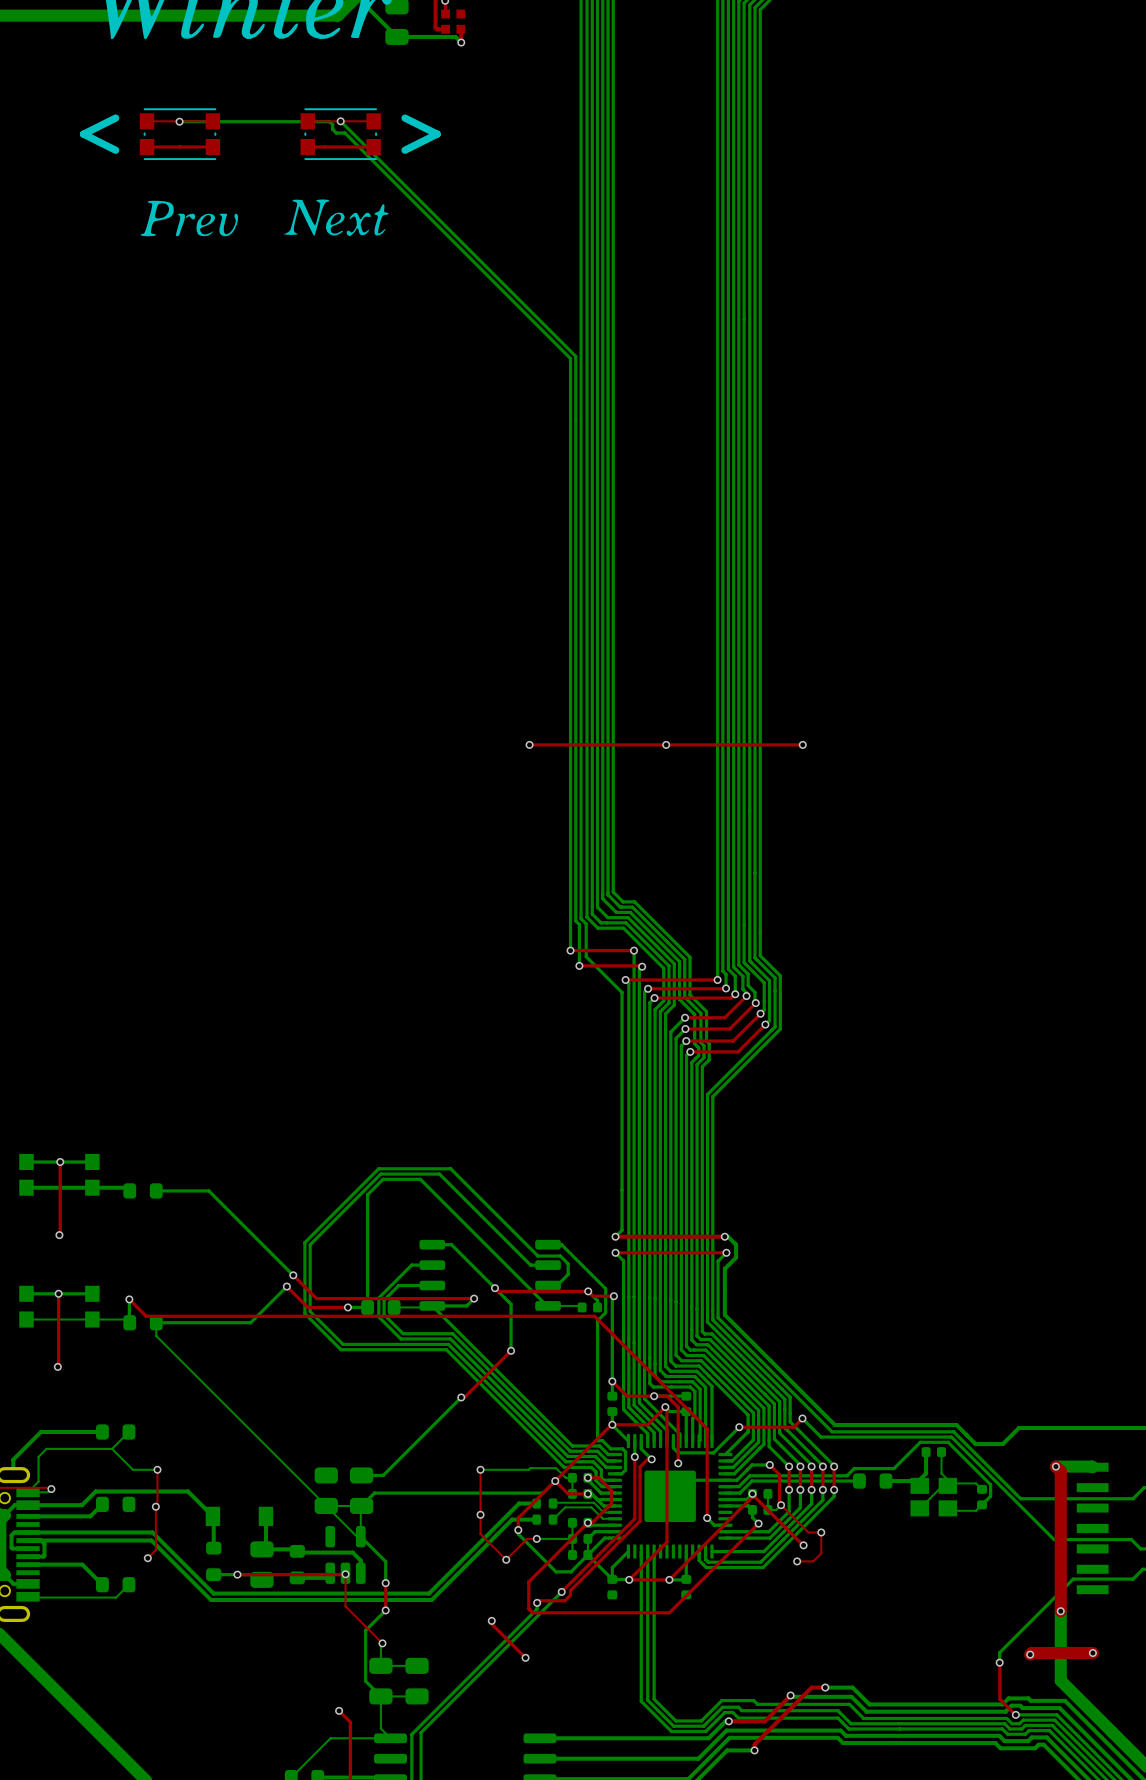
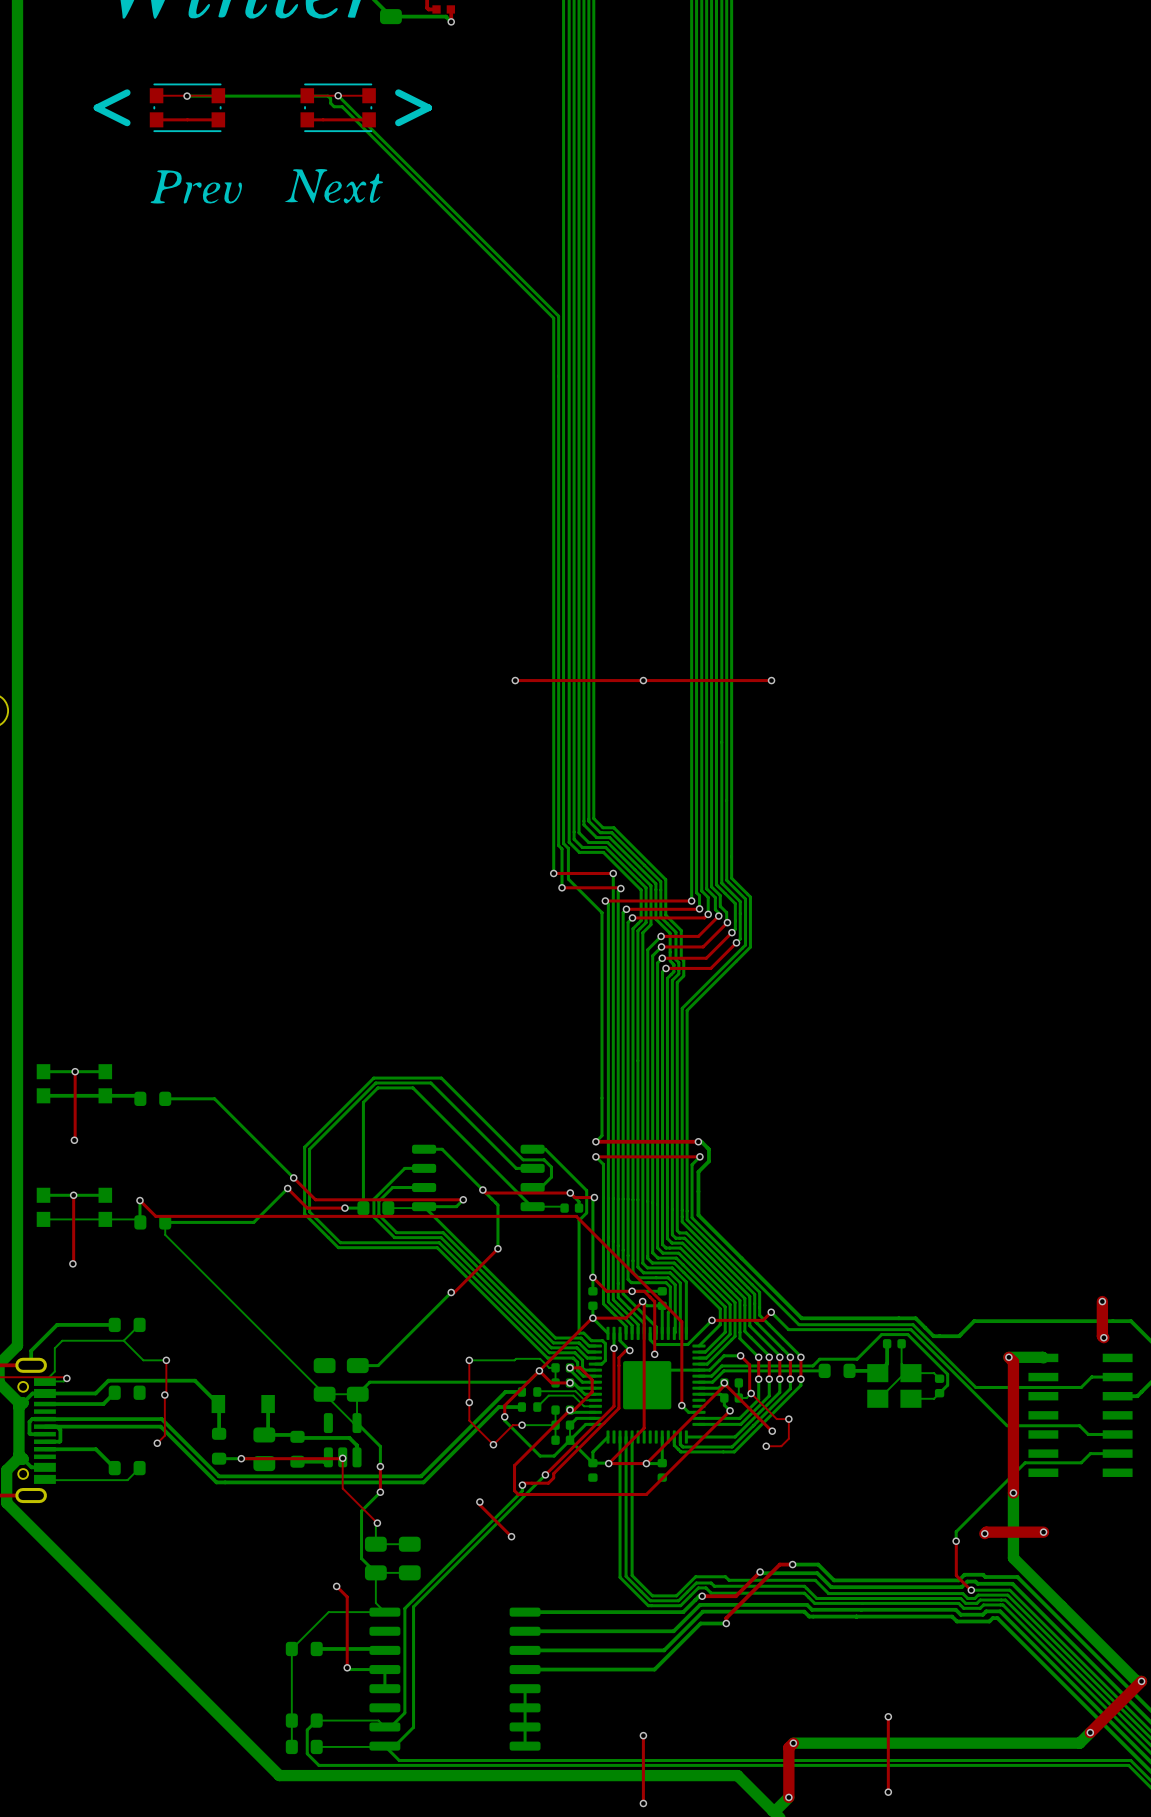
part footprint: [910, 1477, 958, 1517] -> [867, 1364, 922, 1408]

